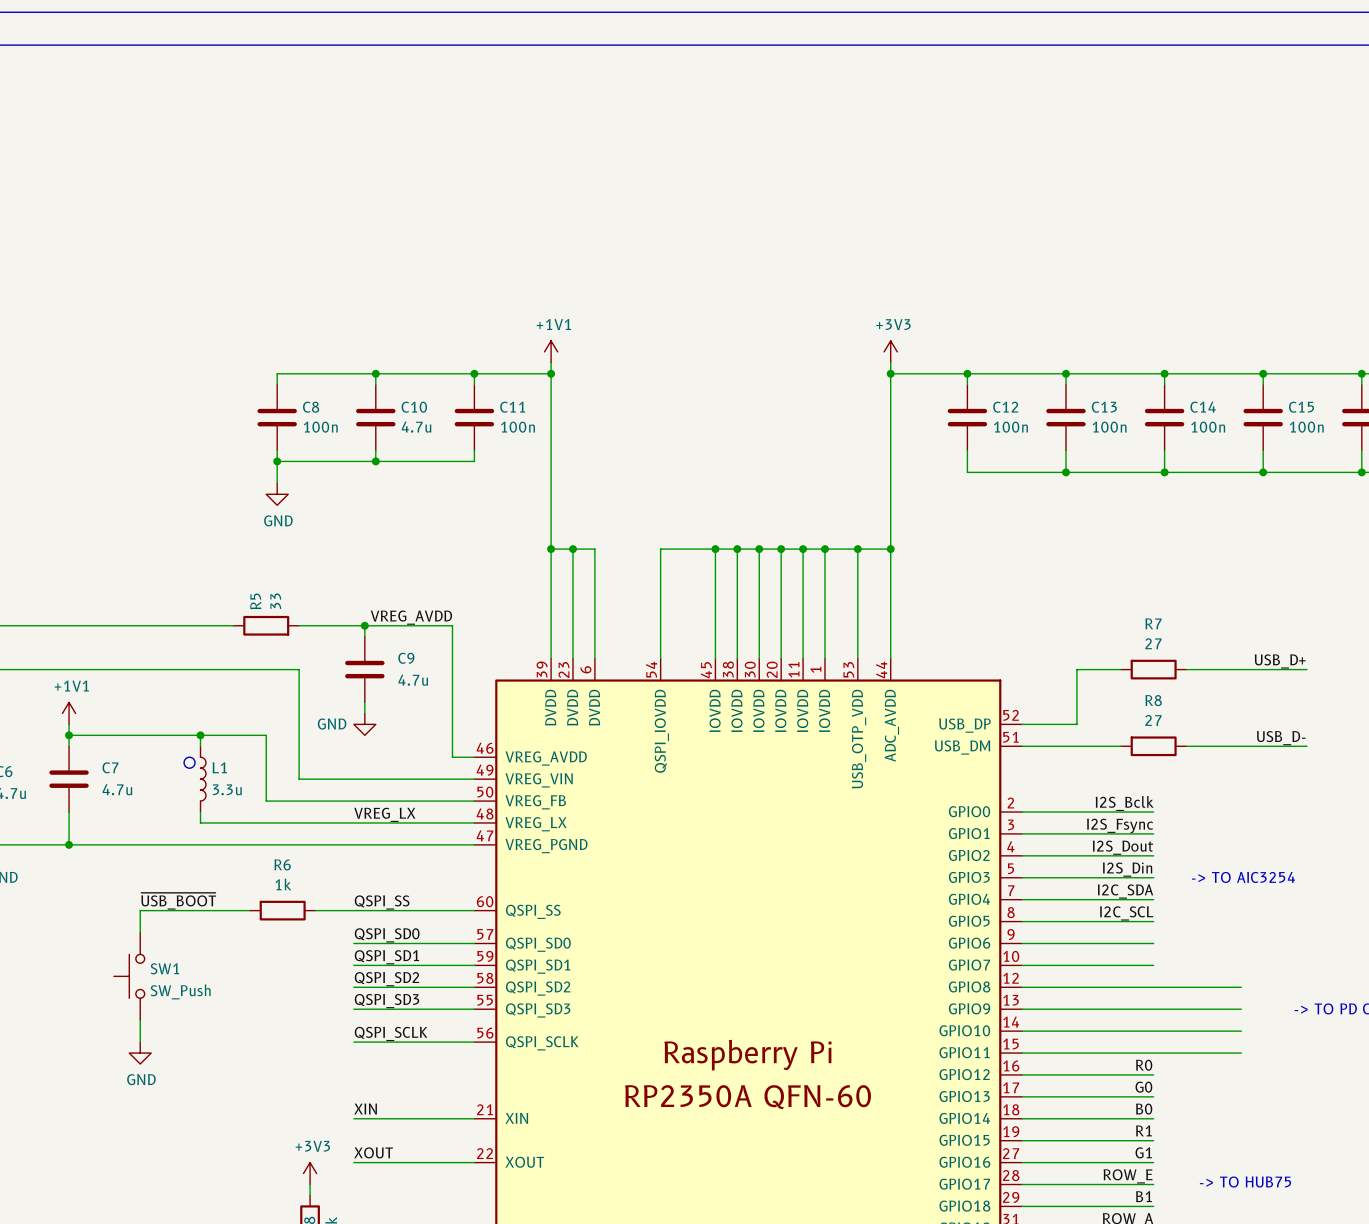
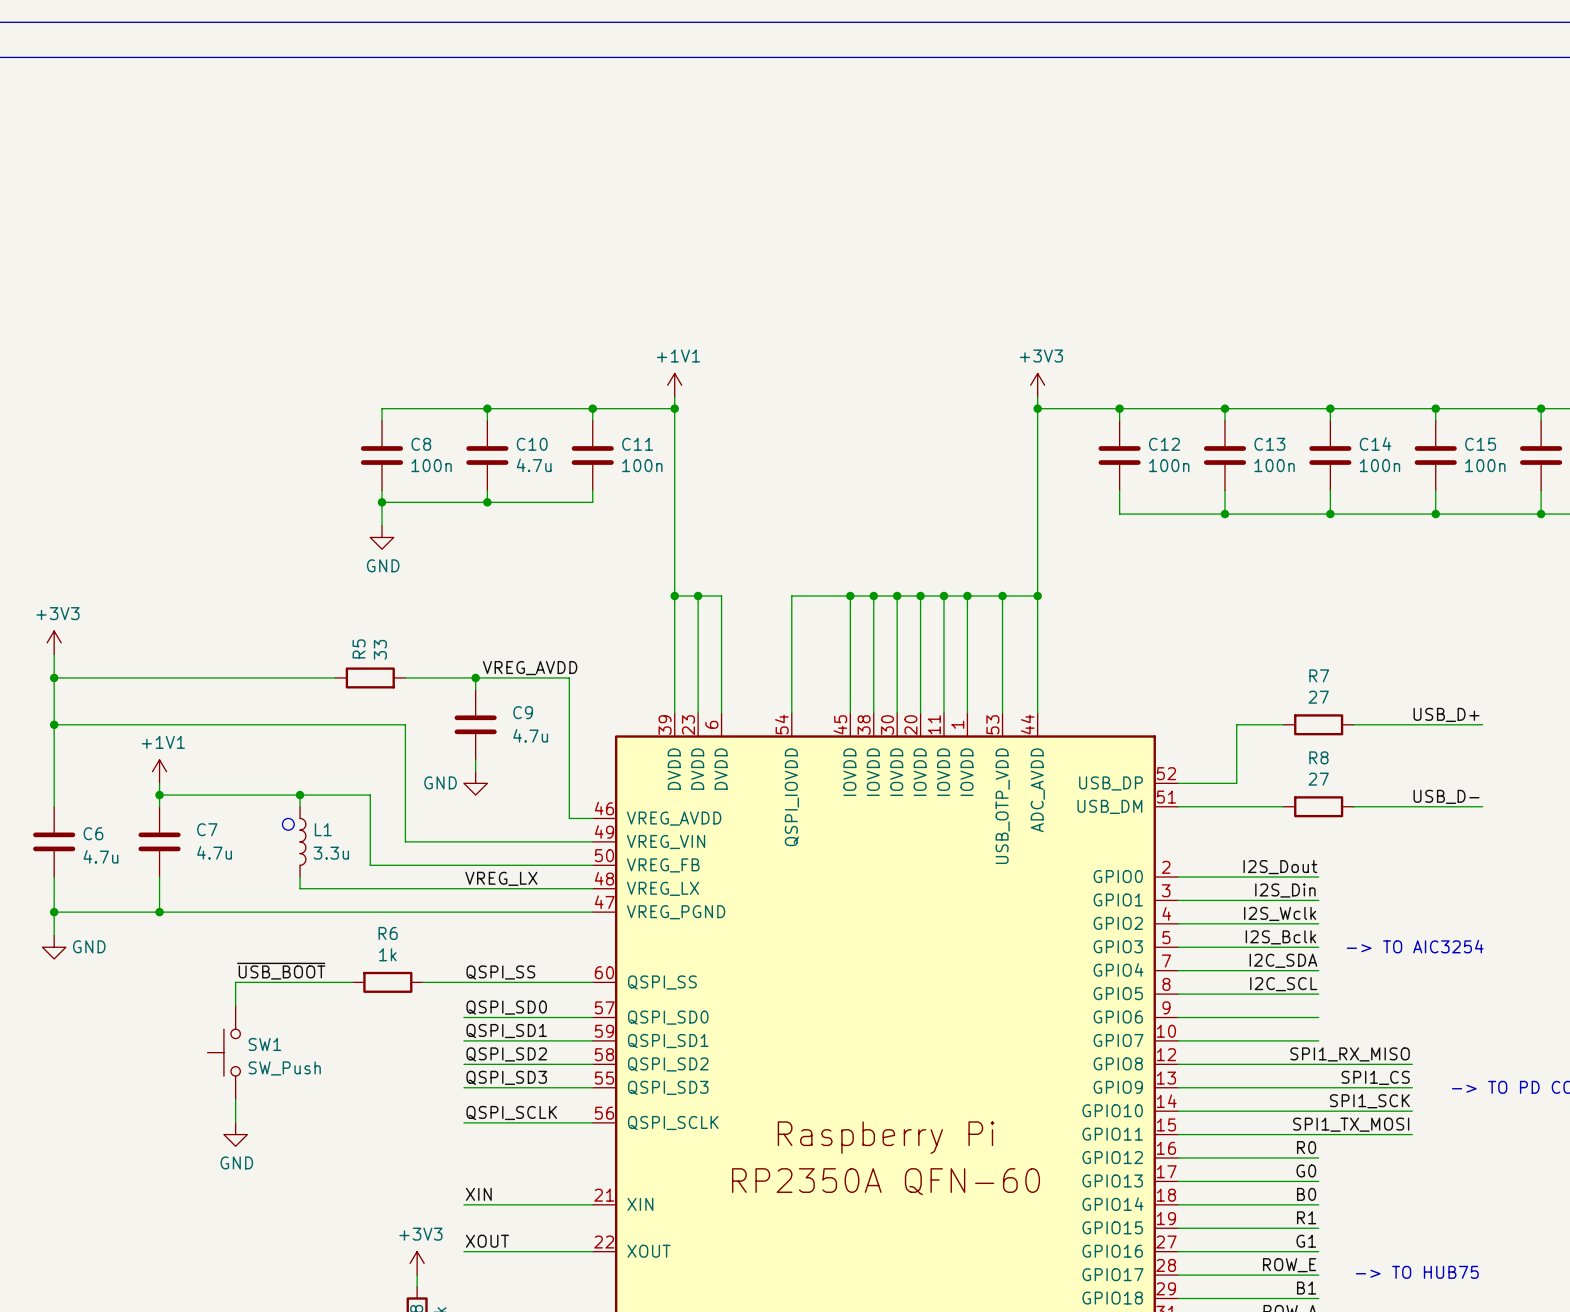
label: I2S_Bclk (1124, 803) -> I2S_Dout (1280, 867)
label: I2S_Fsync (1120, 825) -> I2S_Din (1285, 890)
label: I2S_Dout (1122, 847) -> I2S_Wclk (1280, 913)
label: I2S_Din (1127, 869) -> I2S_Bclk (1280, 937)
label: none -> SPI1_RX_MISO (1350, 1054)
label: none -> SPI1_CS (1375, 1077)
label: none -> SPI1_SCK (1369, 1101)
label: none -> SPI1_TX_MOSI (1351, 1124)

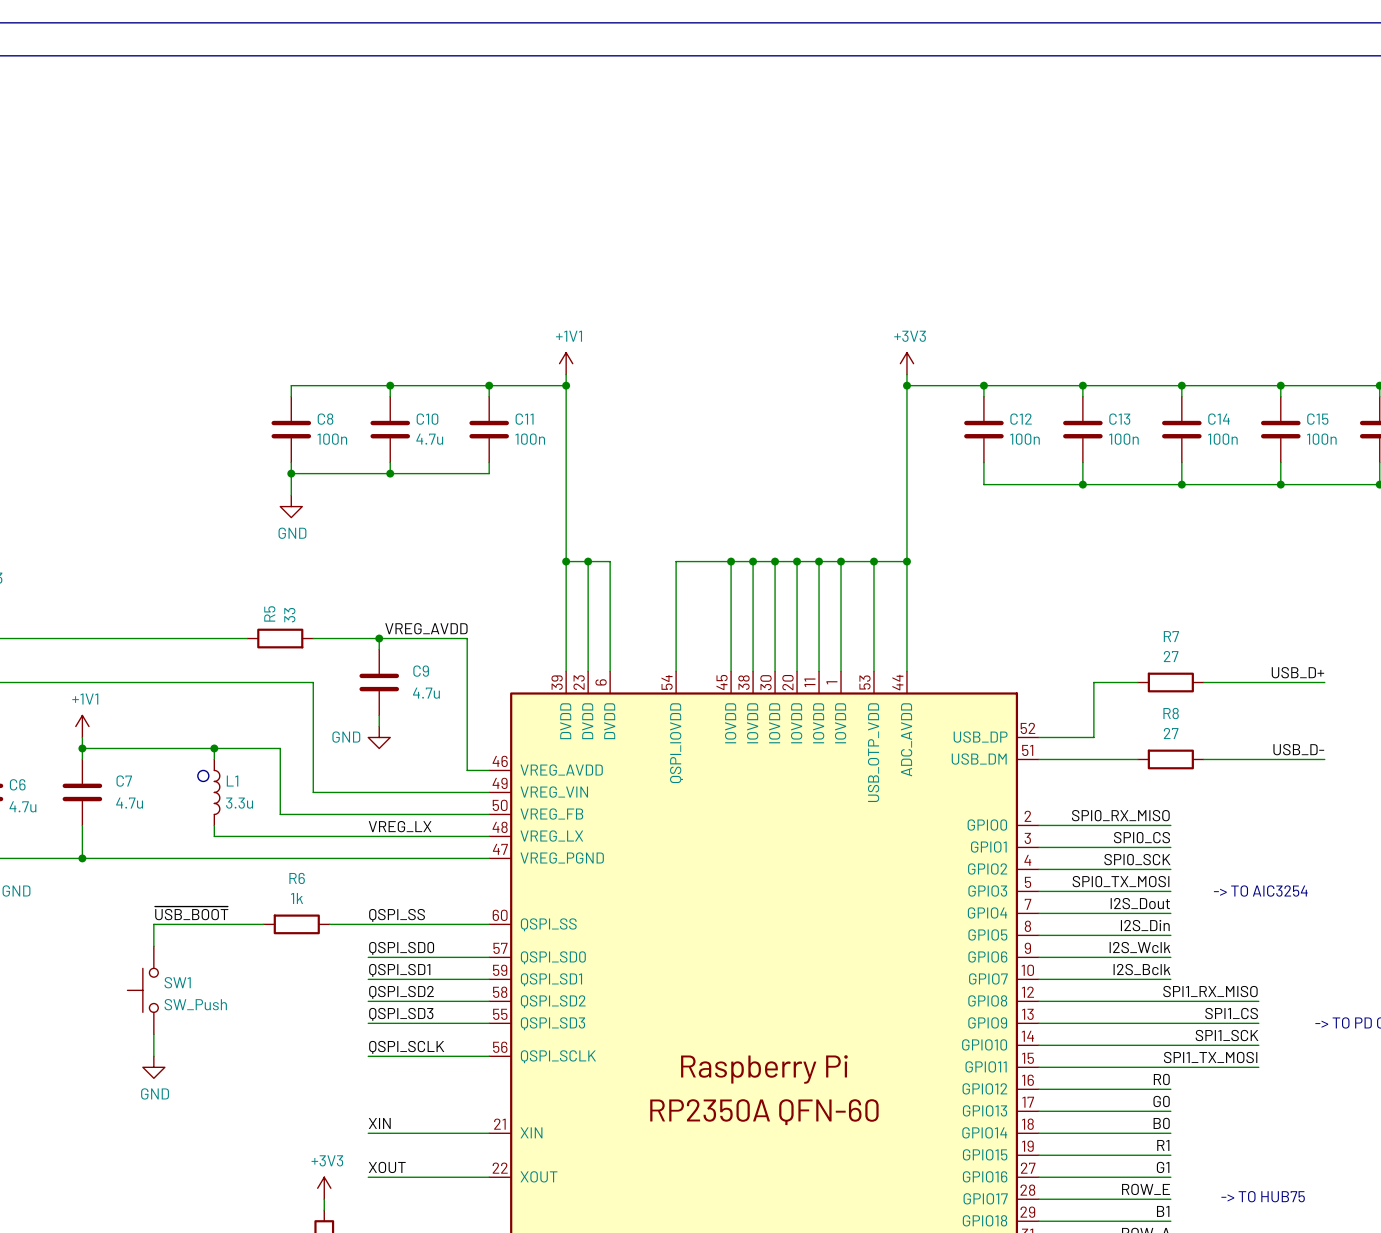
label: I2S_Dout (1280, 867) -> SPI0_RX_MISO (1120, 815)
label: I2S_Din (1285, 890) -> SPI0_CS (1141, 837)
label: I2S_Wclk (1280, 913) -> SPI0_SCK (1137, 859)
label: I2S_Bclk (1280, 937) -> SPI0_TX_MOSI (1120, 881)
label: I2C_SDA (1283, 960) -> I2S_Dout (1140, 903)
label: I2C_SCL (1283, 984) -> I2S_Din (1145, 925)
label: none -> I2S_Wclk (1140, 947)
label: none -> I2S_Bclk (1141, 969)

